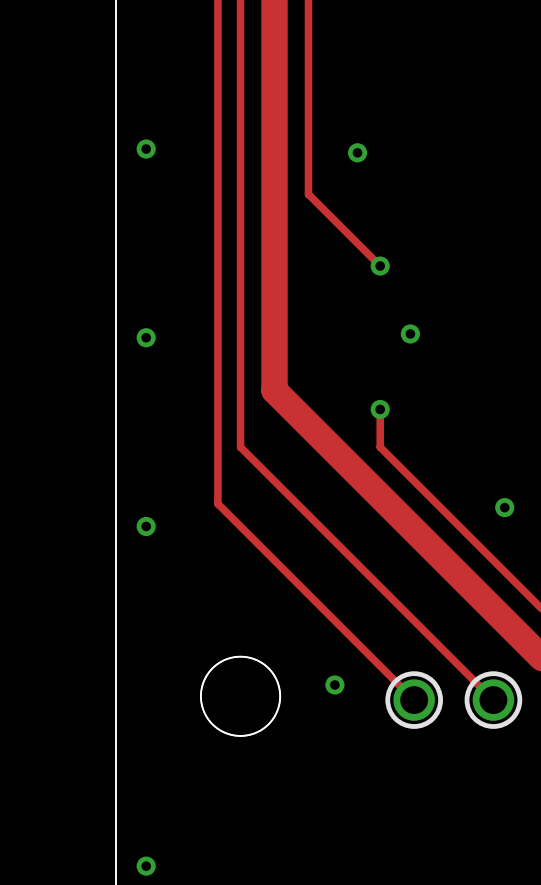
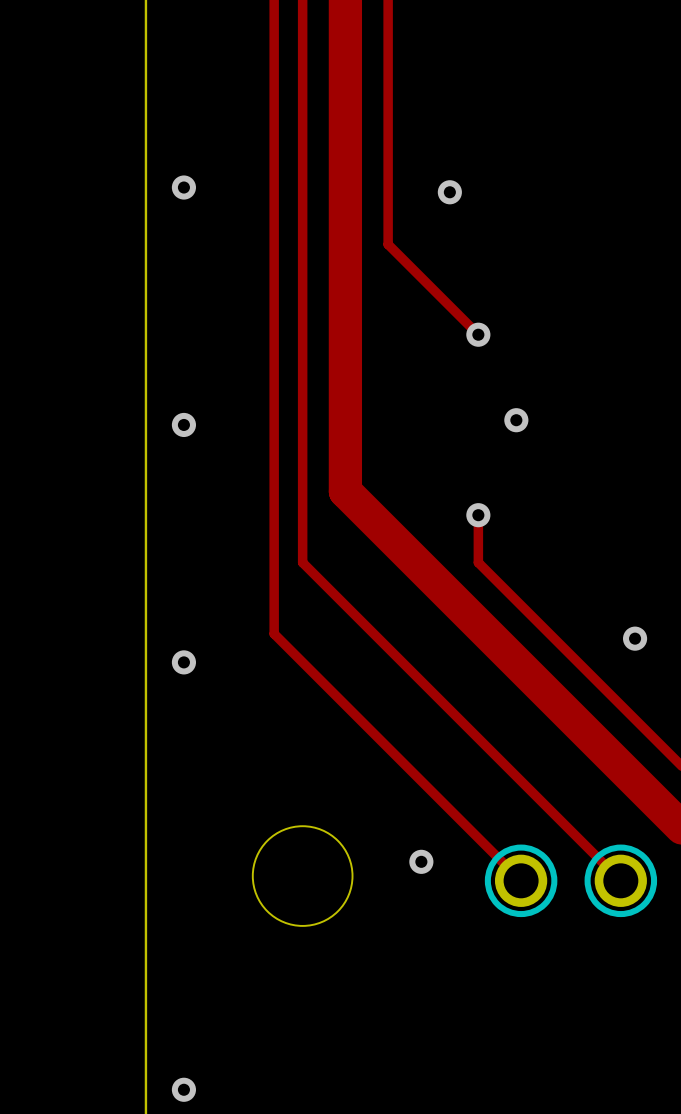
round board edge: [199, 655, 282, 737] -> none

